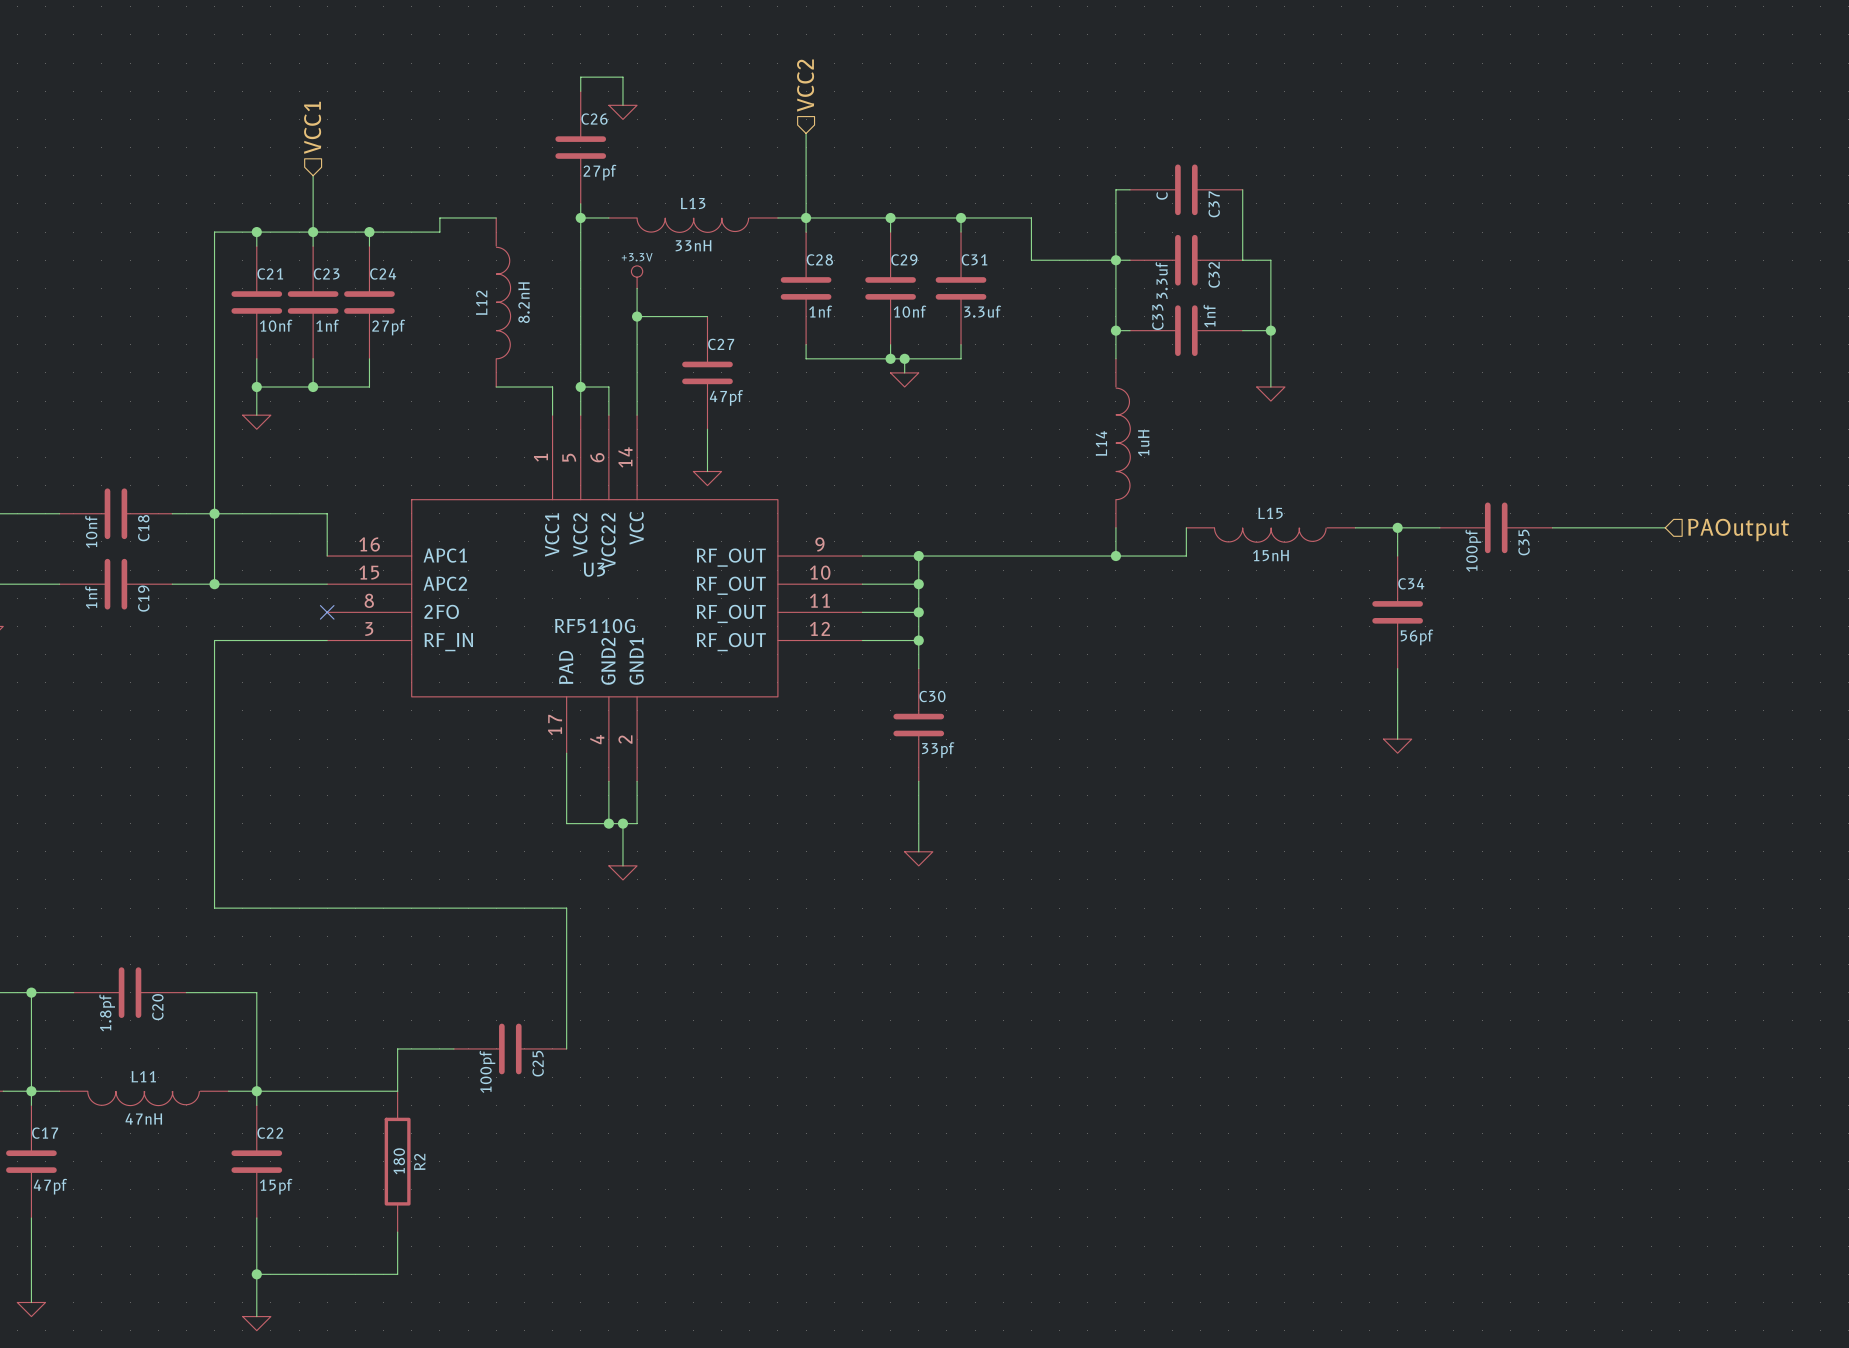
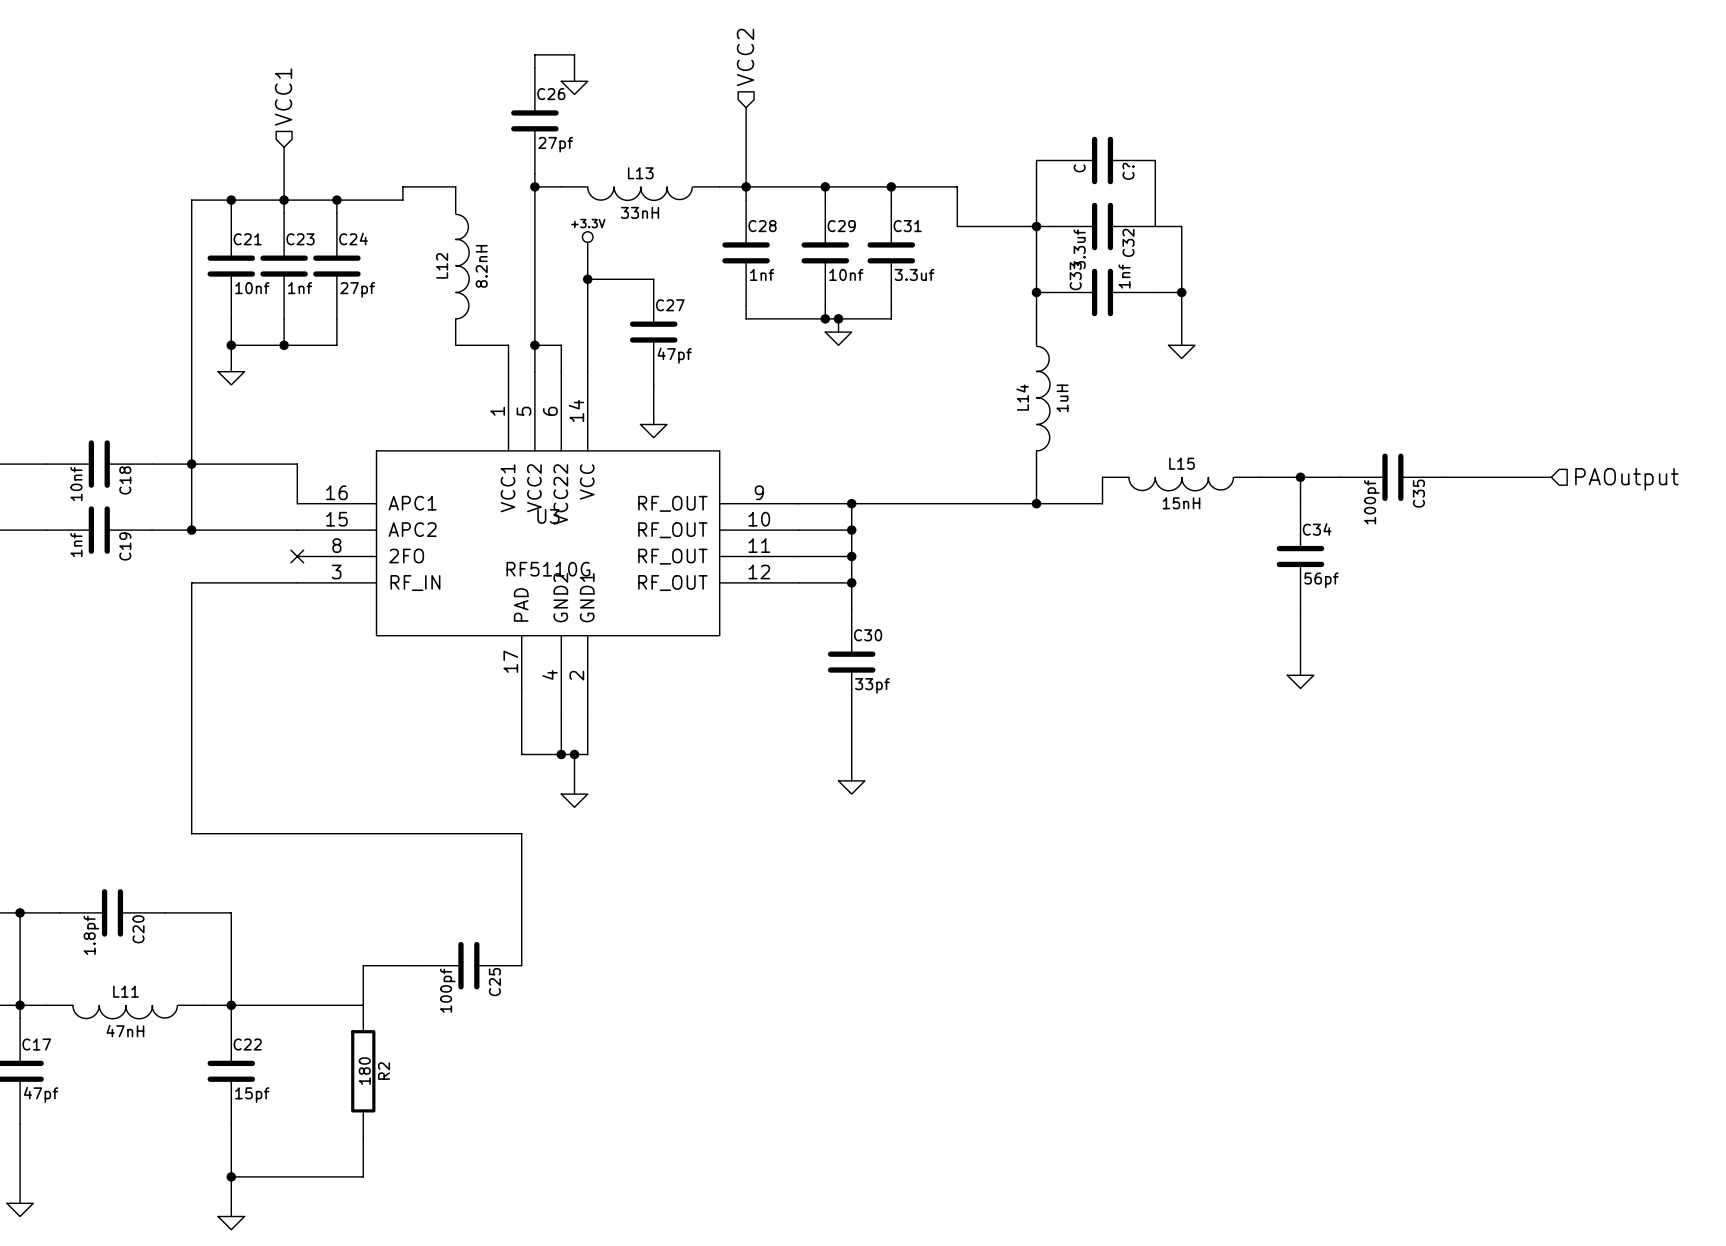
C37 name: C37 (1214, 204) -> C? (1128, 171)

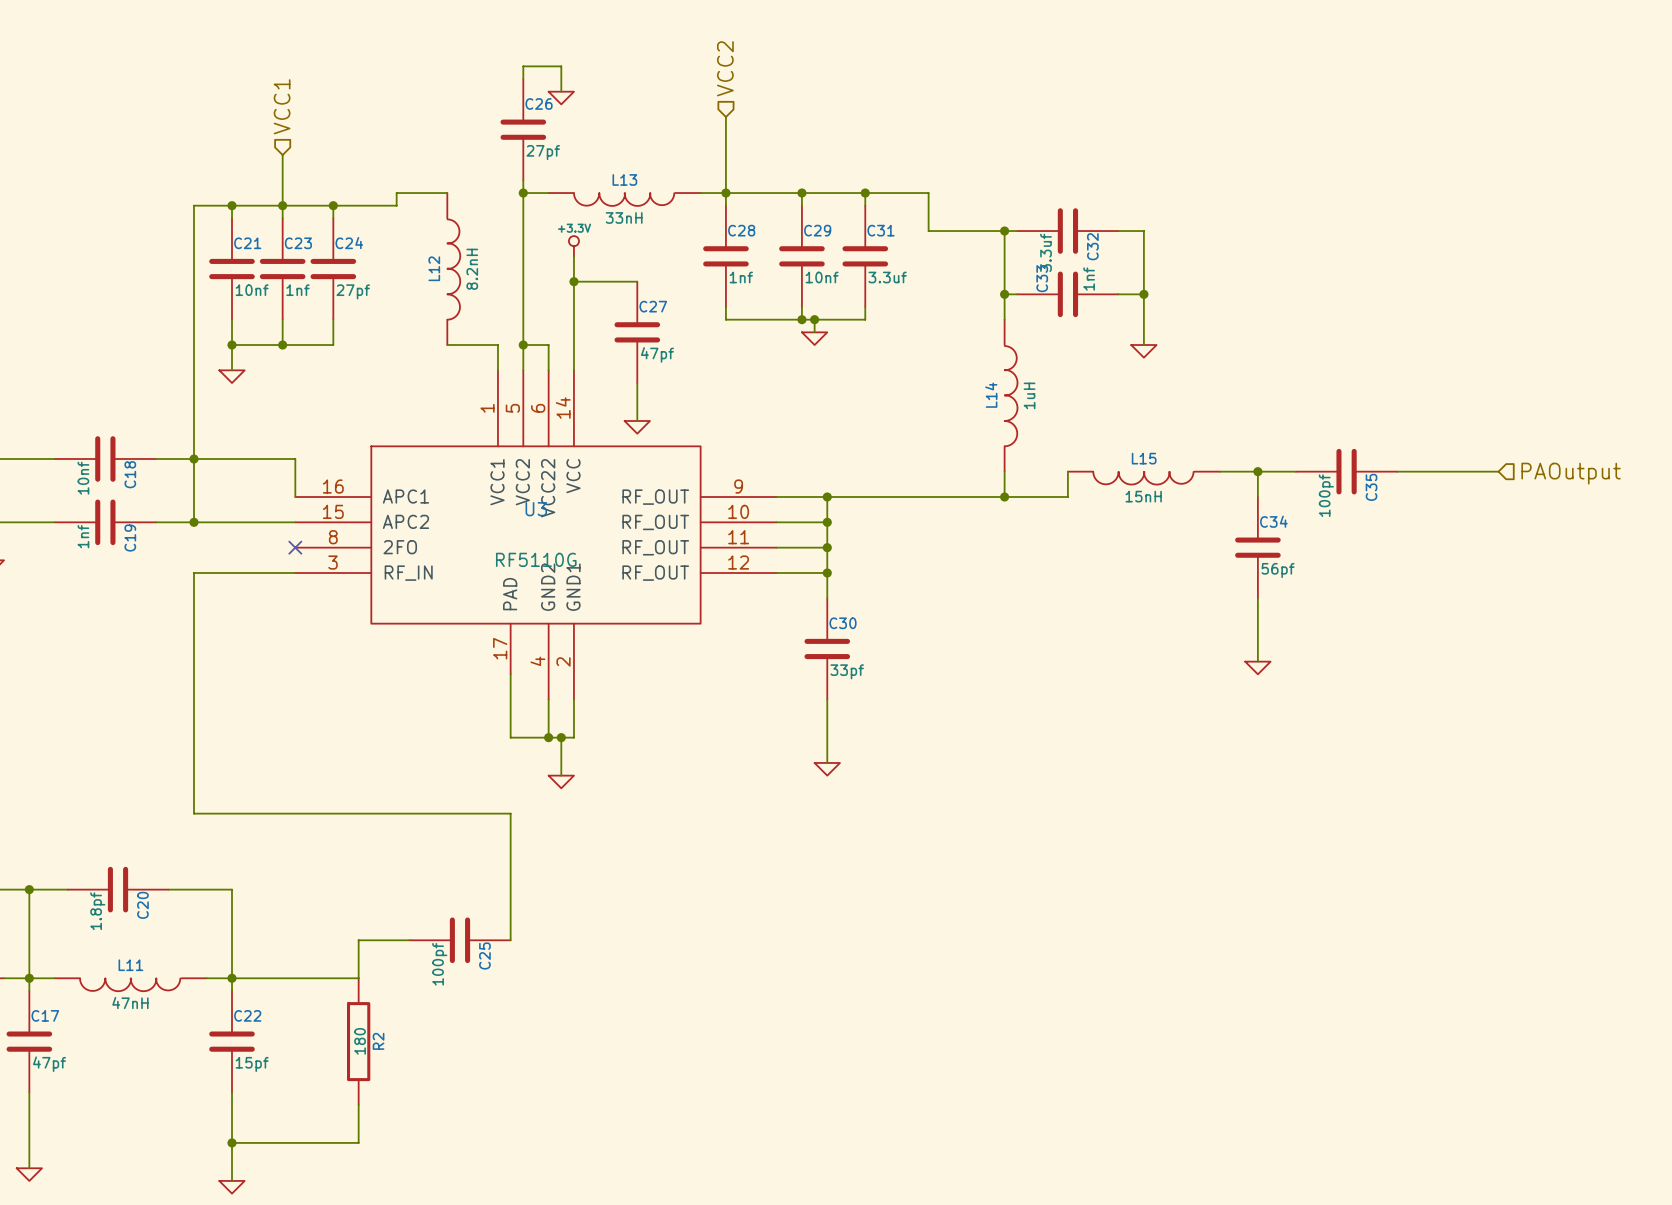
wire: (1049, 160) (1036, 160) (1036, 226) -> none
C?: C (1102, 160) -> none
wire: (1155, 160) (1155, 226) -> none

